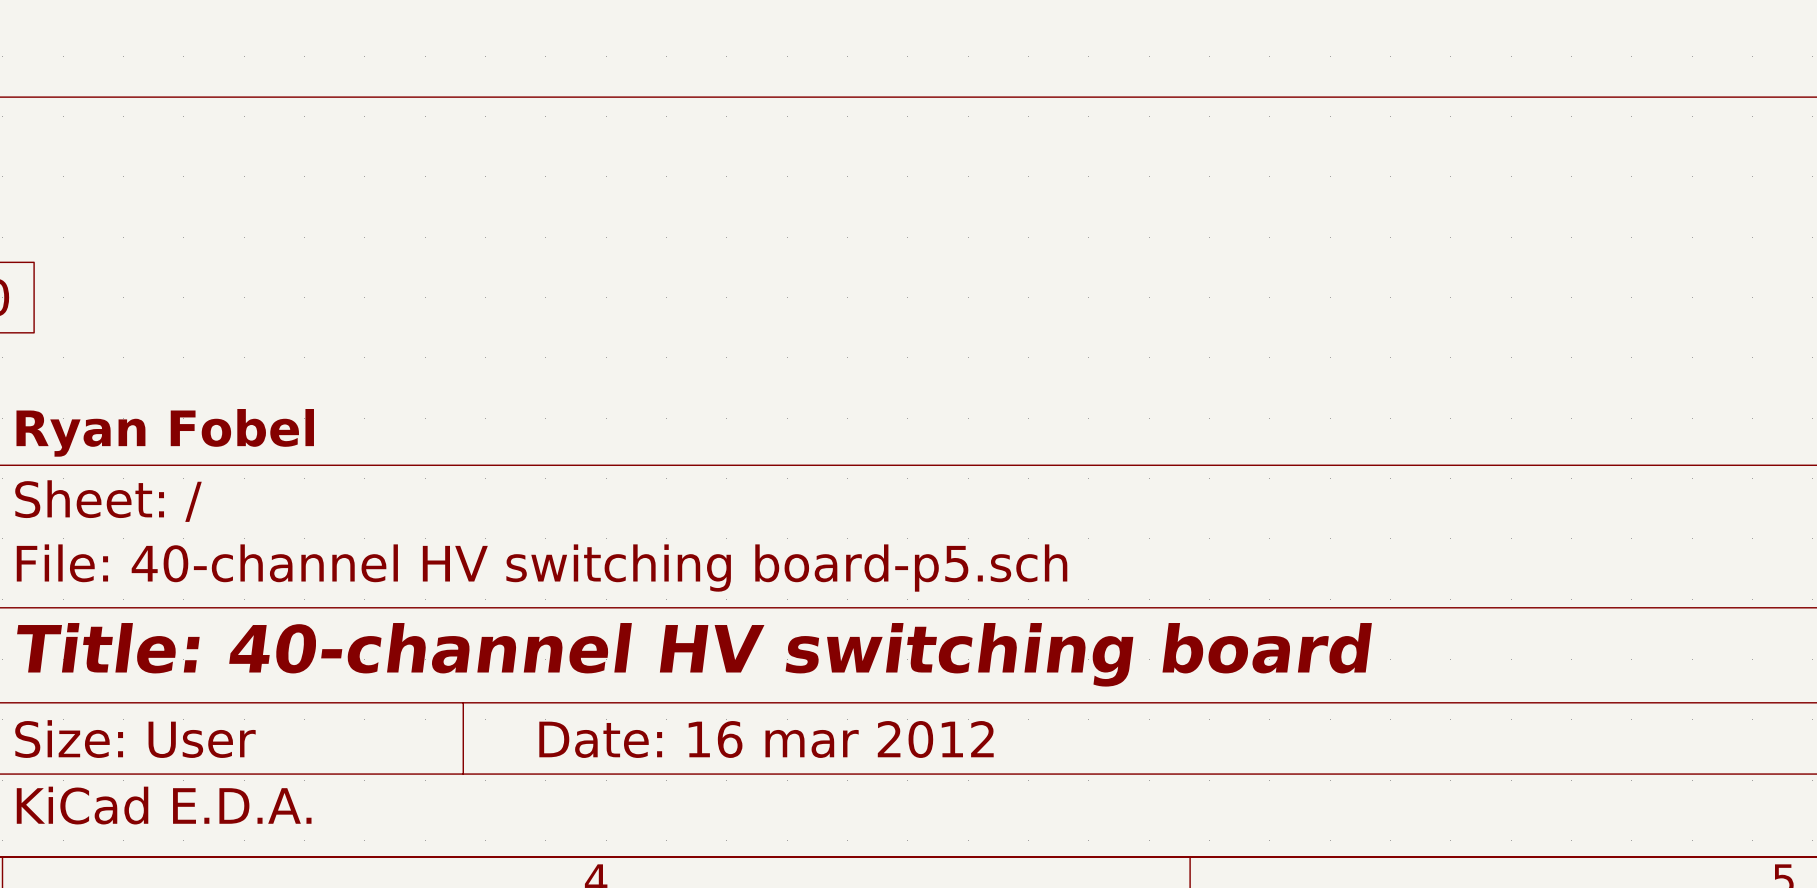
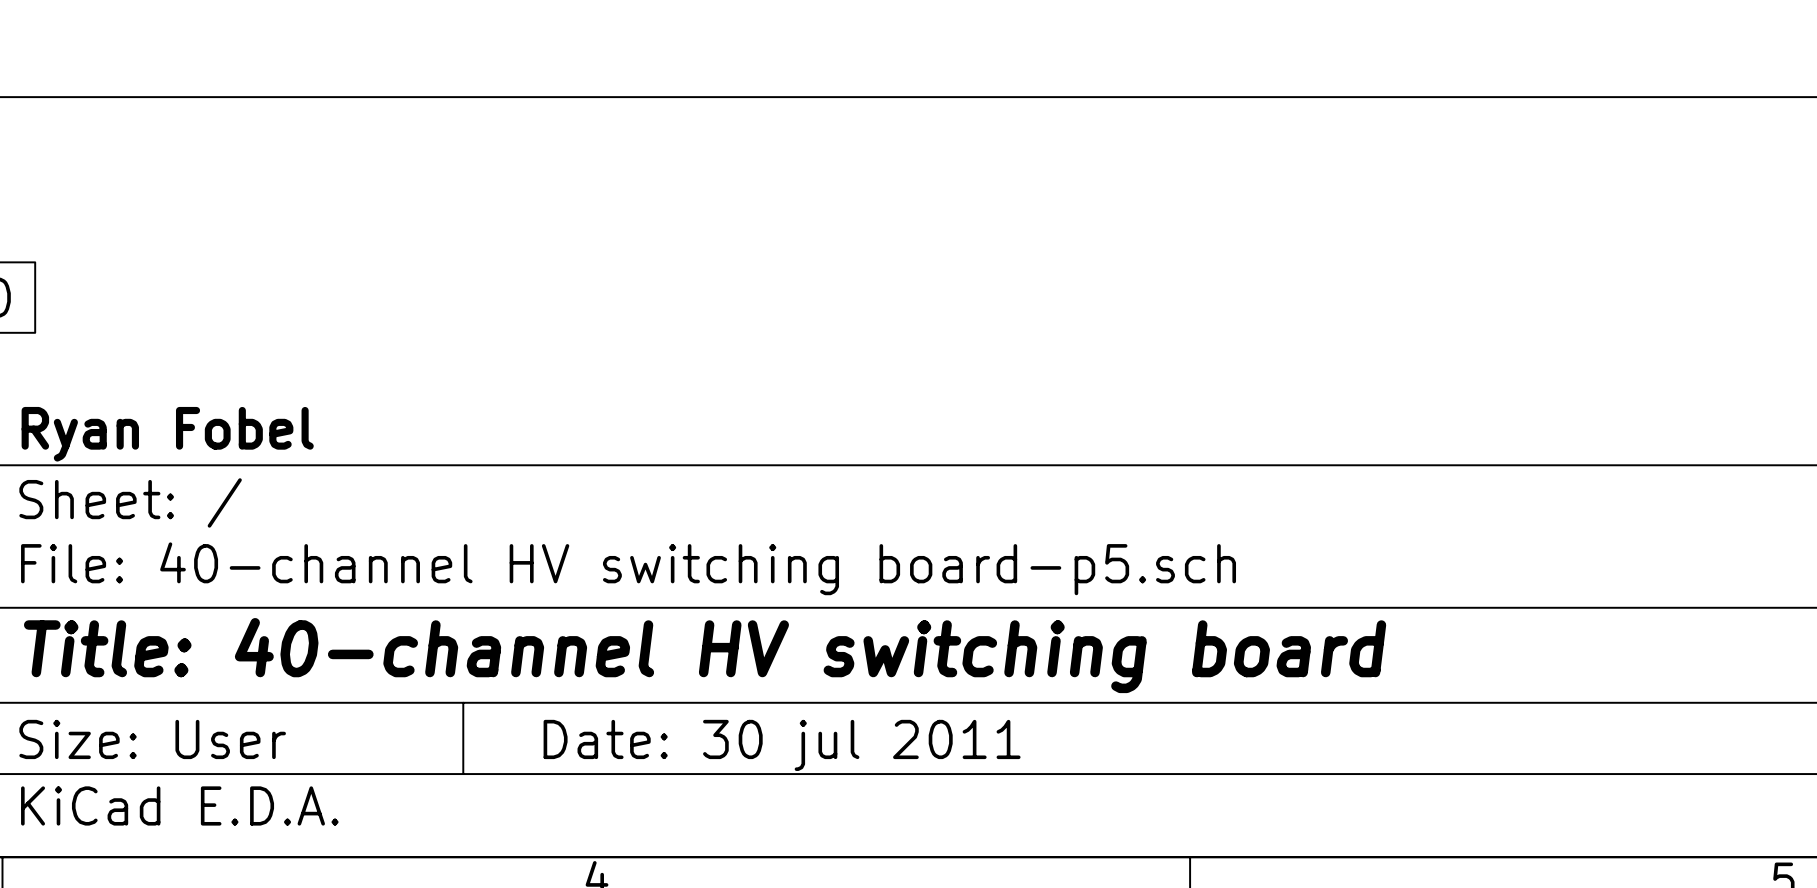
title block: Date: 16 mar 2012 (766, 739) -> Date: 30 jul 2011 (782, 745)

